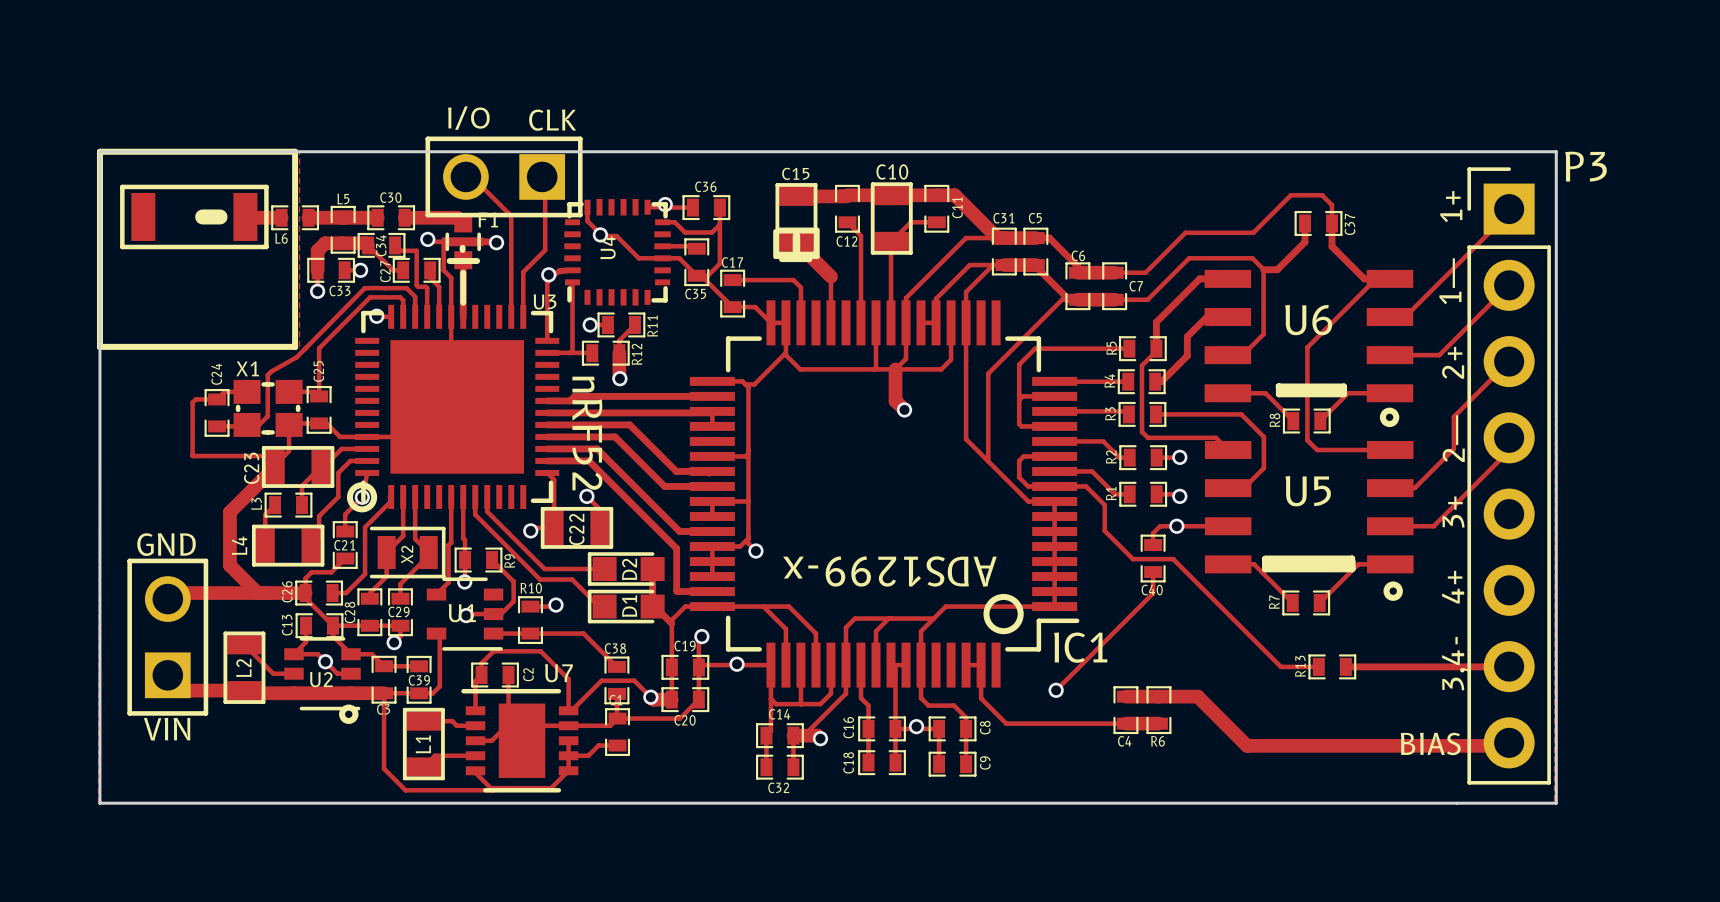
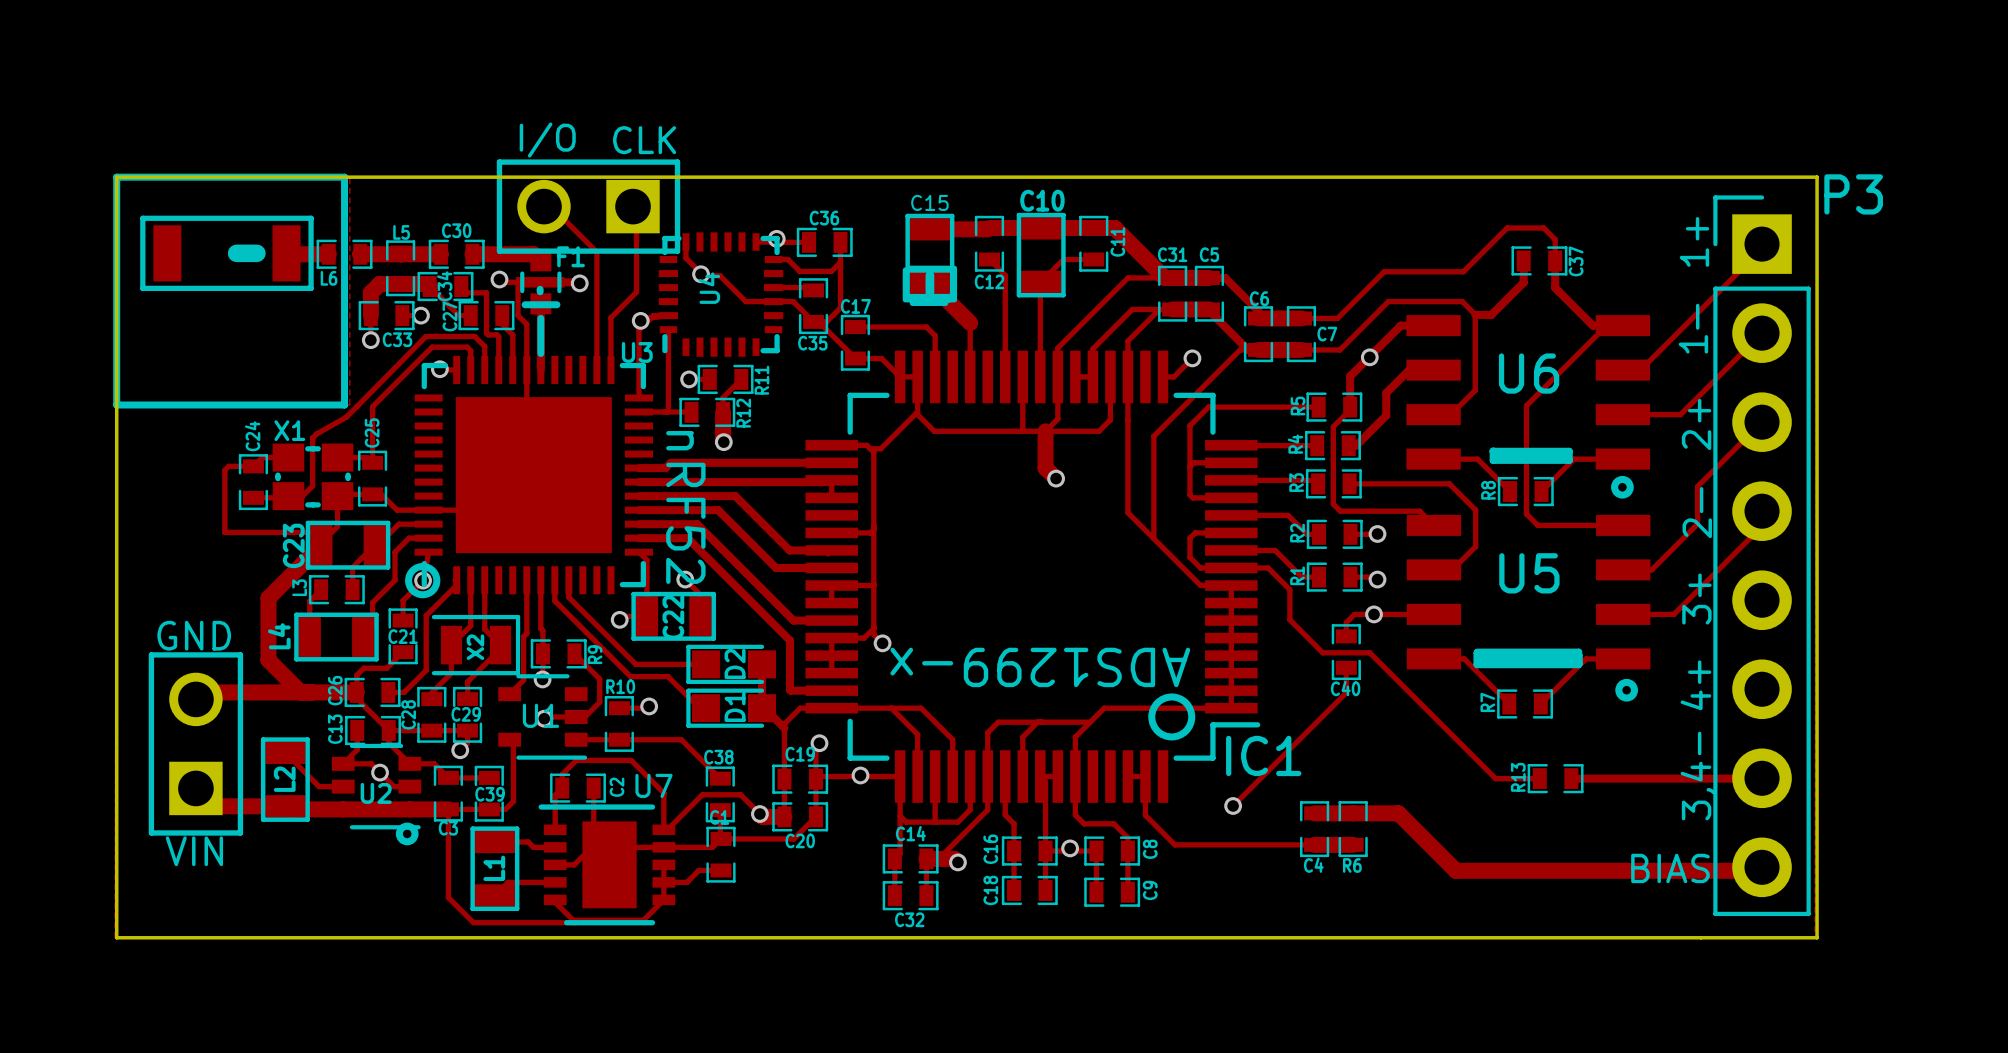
track: none -> (1192, 358) (1173, 376) (1163, 376)
via: none -> (1192, 358)
via: none -> (1369, 357)

